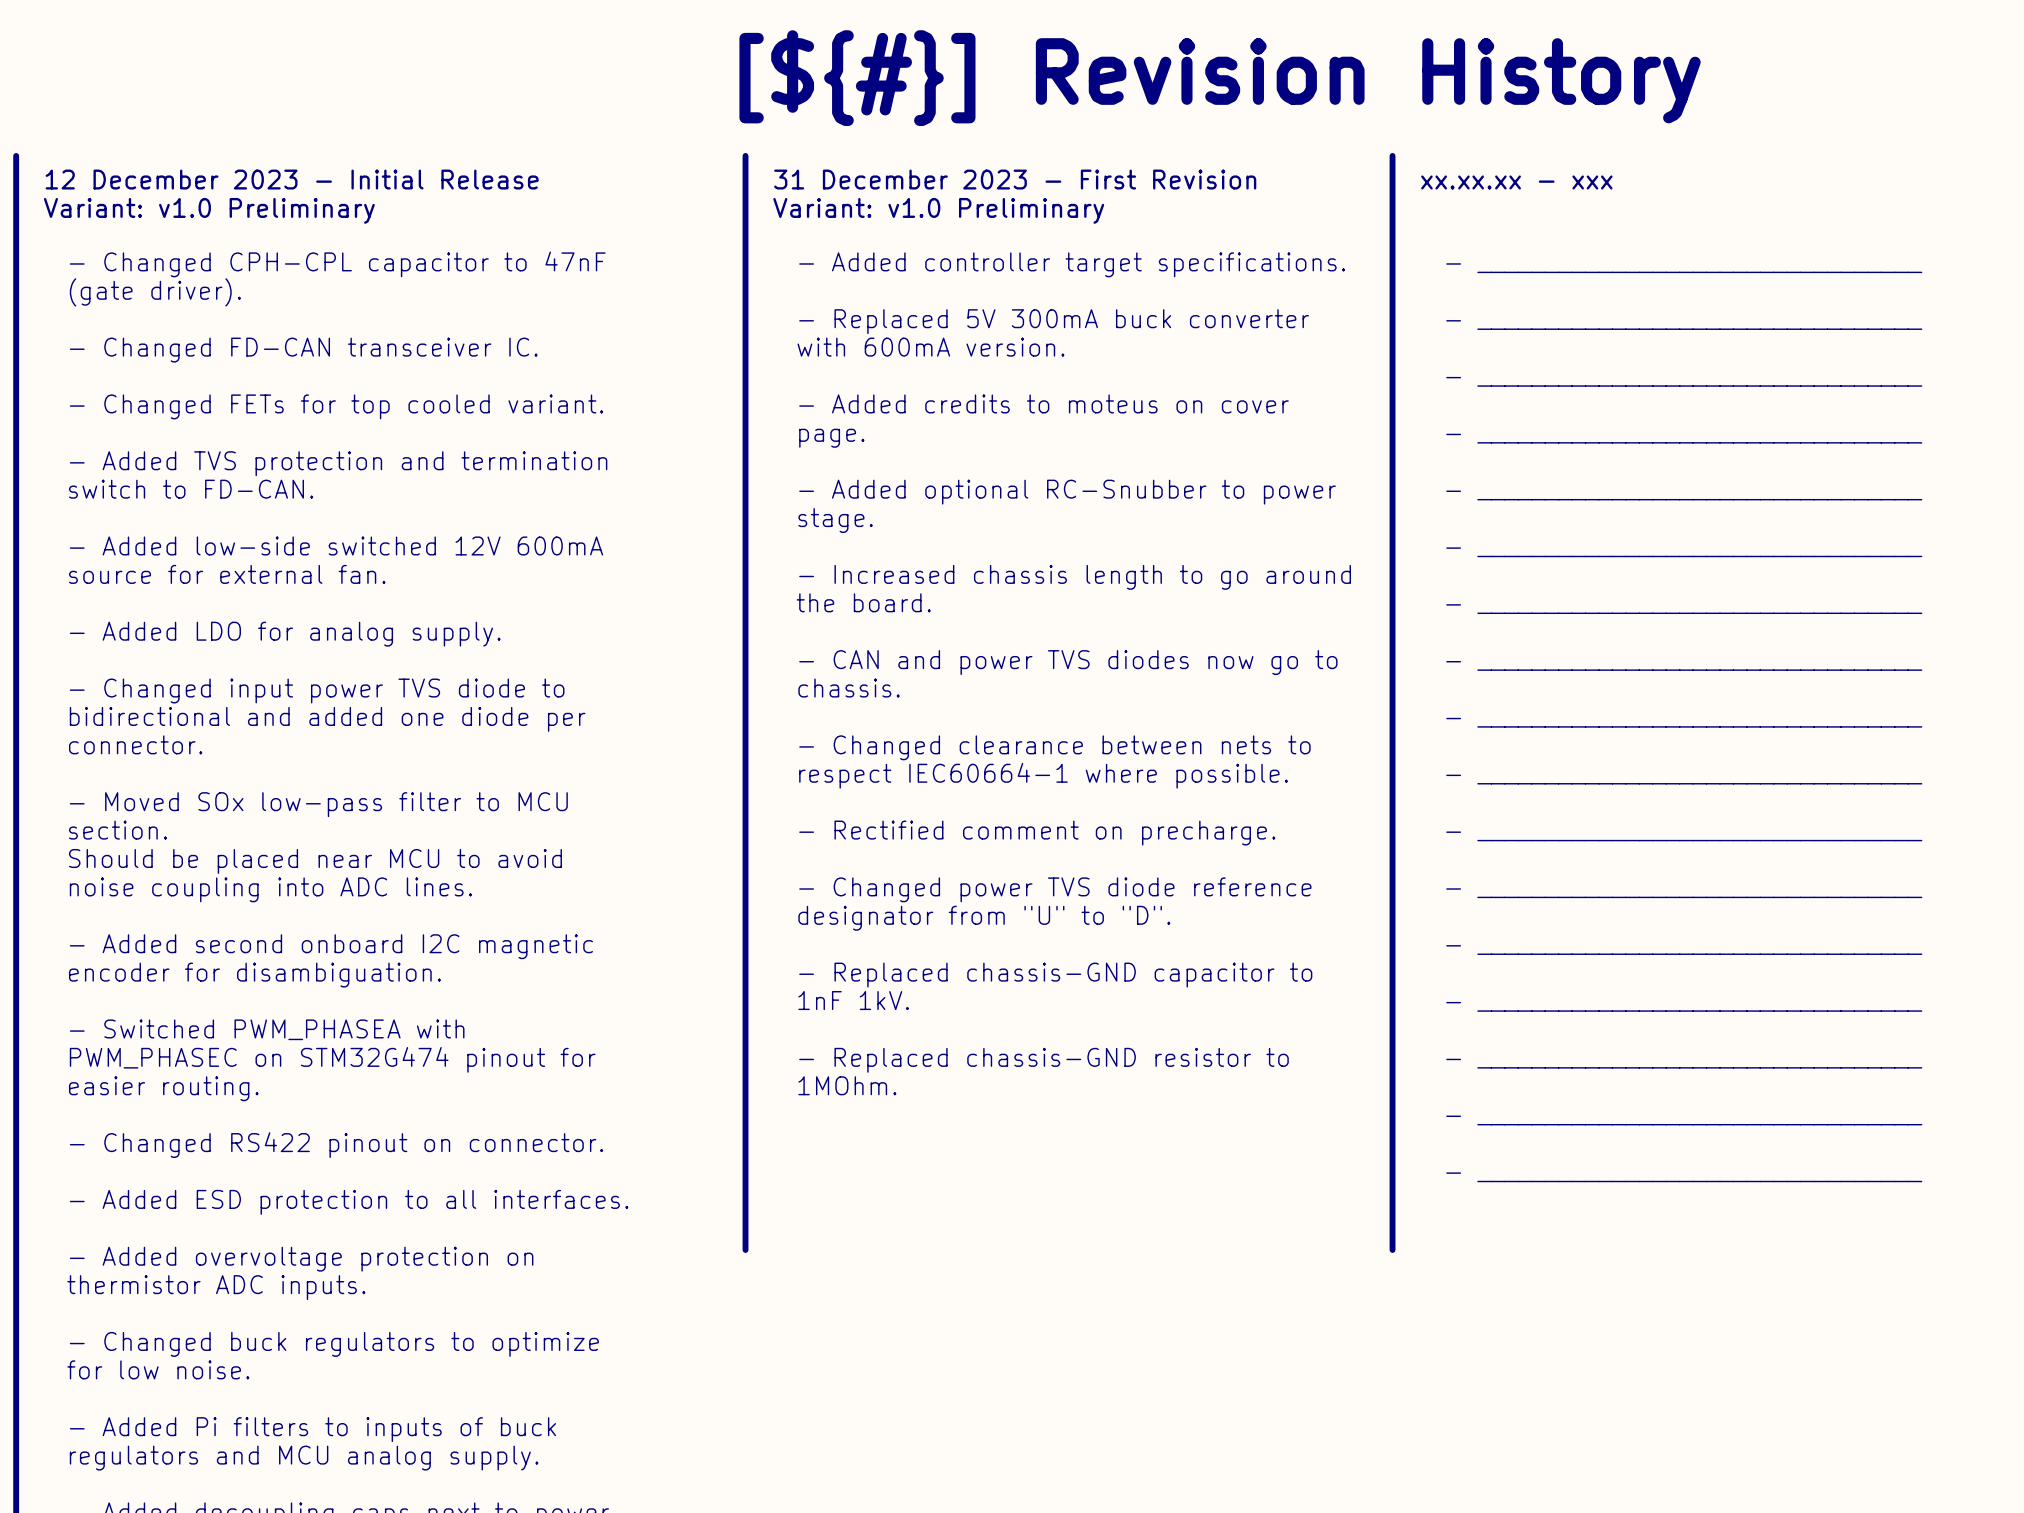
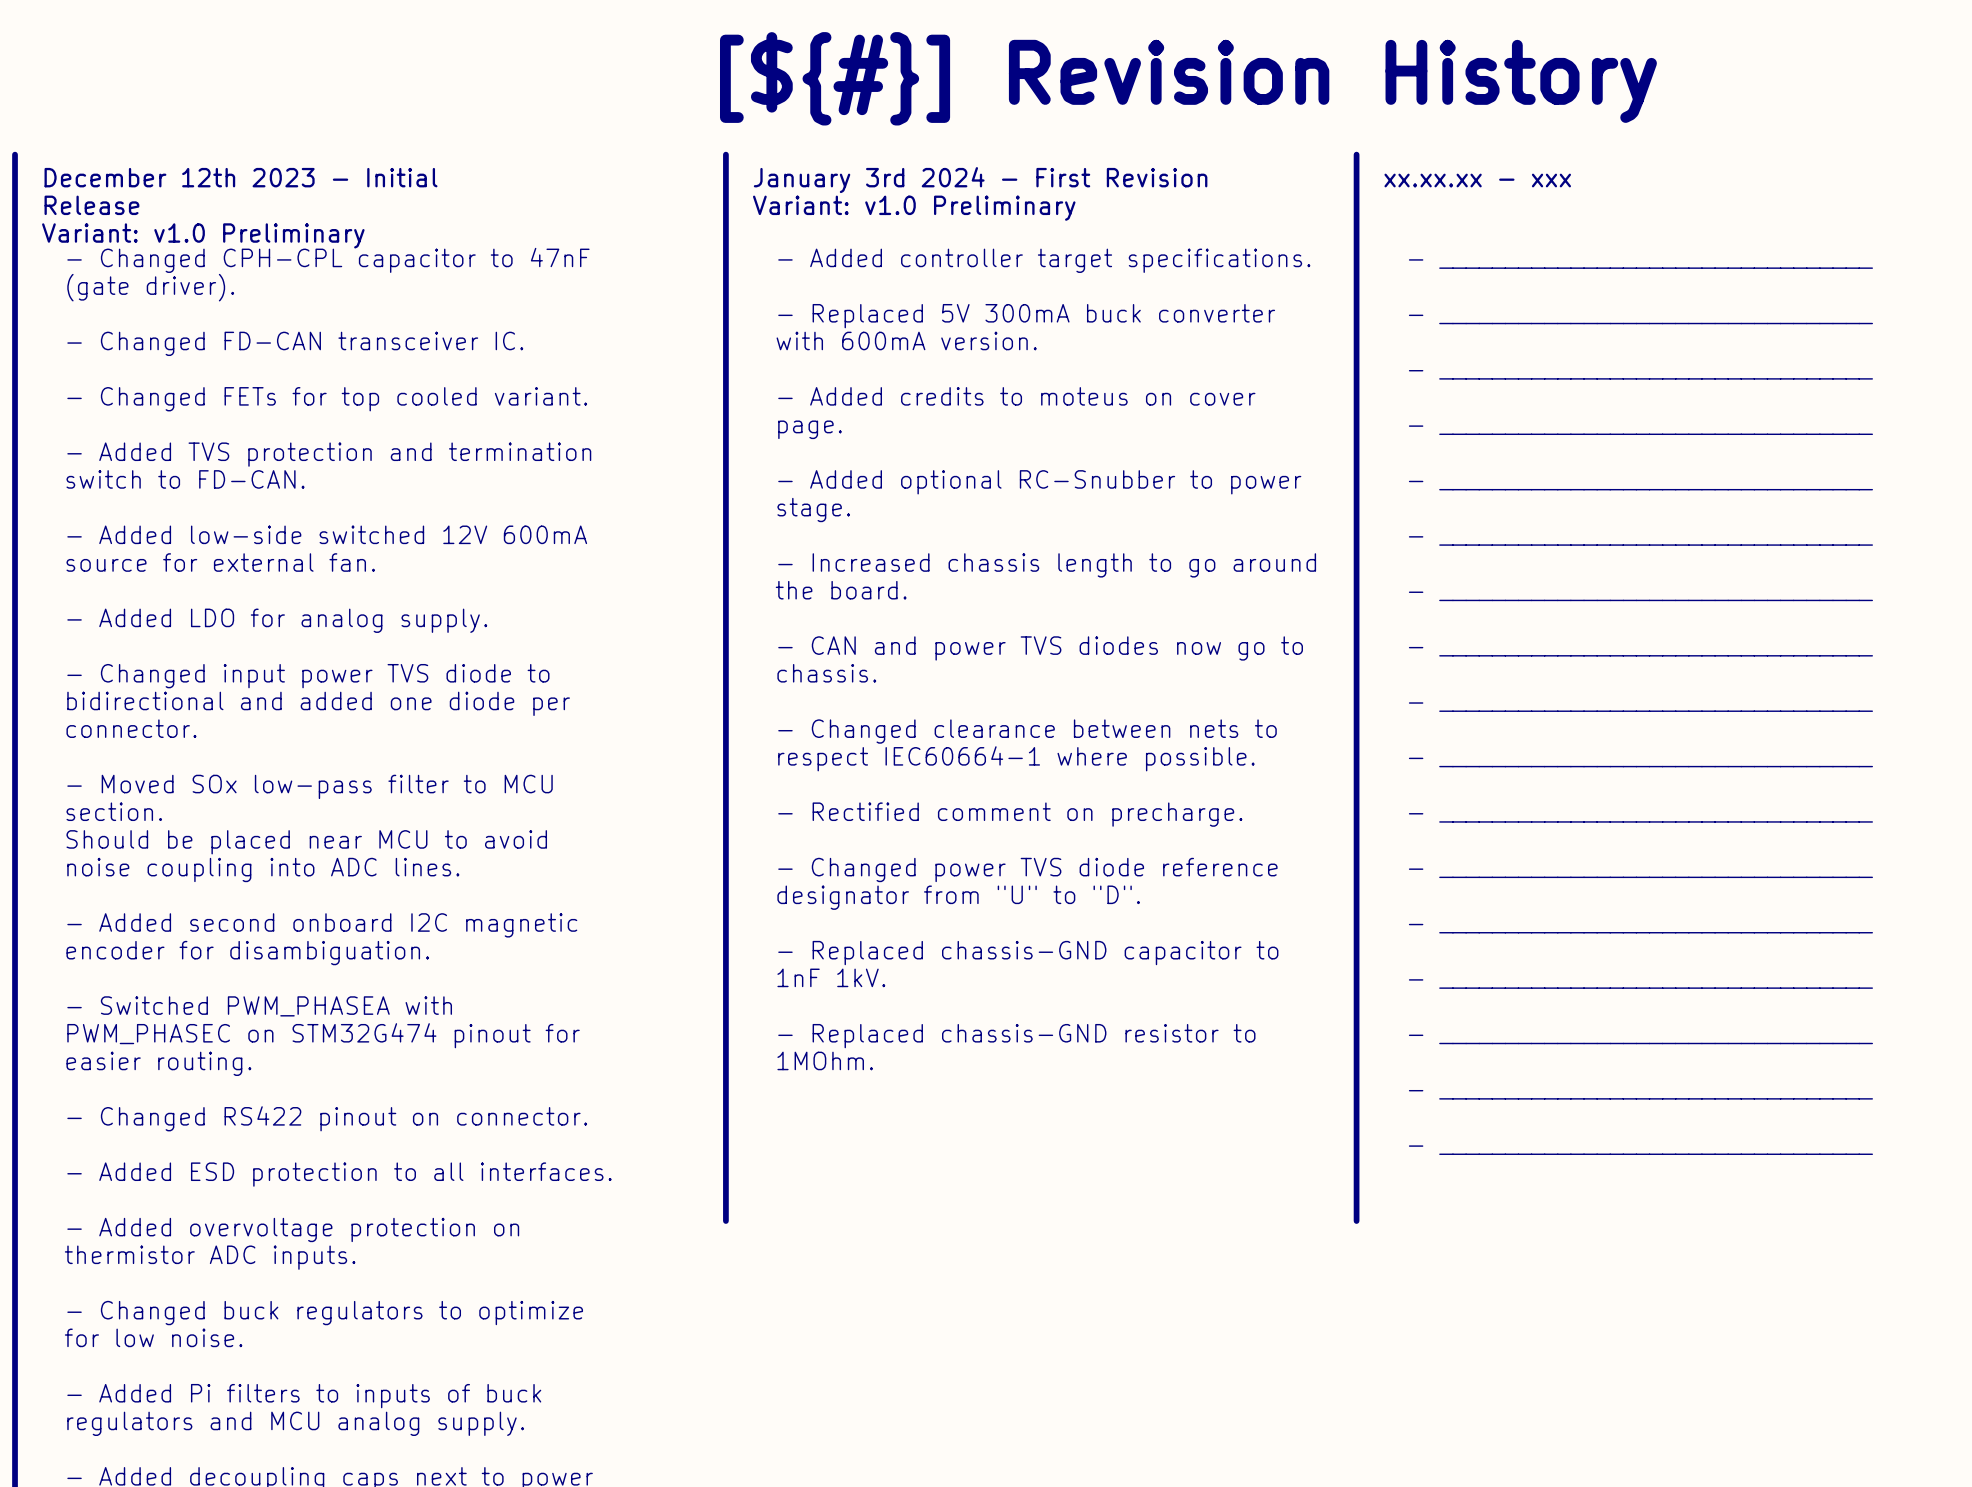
text: 12 December 2023 - Initial Release (292, 179) -> December 12th 2023 - Initial (241, 177)
text: 31 December 2023 - First Revision (1015, 179) -> January 3rd 2024 - First Revision (980, 180)
text: Variant: v1.0 Preliminary (209, 210) -> Release (91, 205)
text: none -> Variant: v1.0 Preliminary (203, 235)

